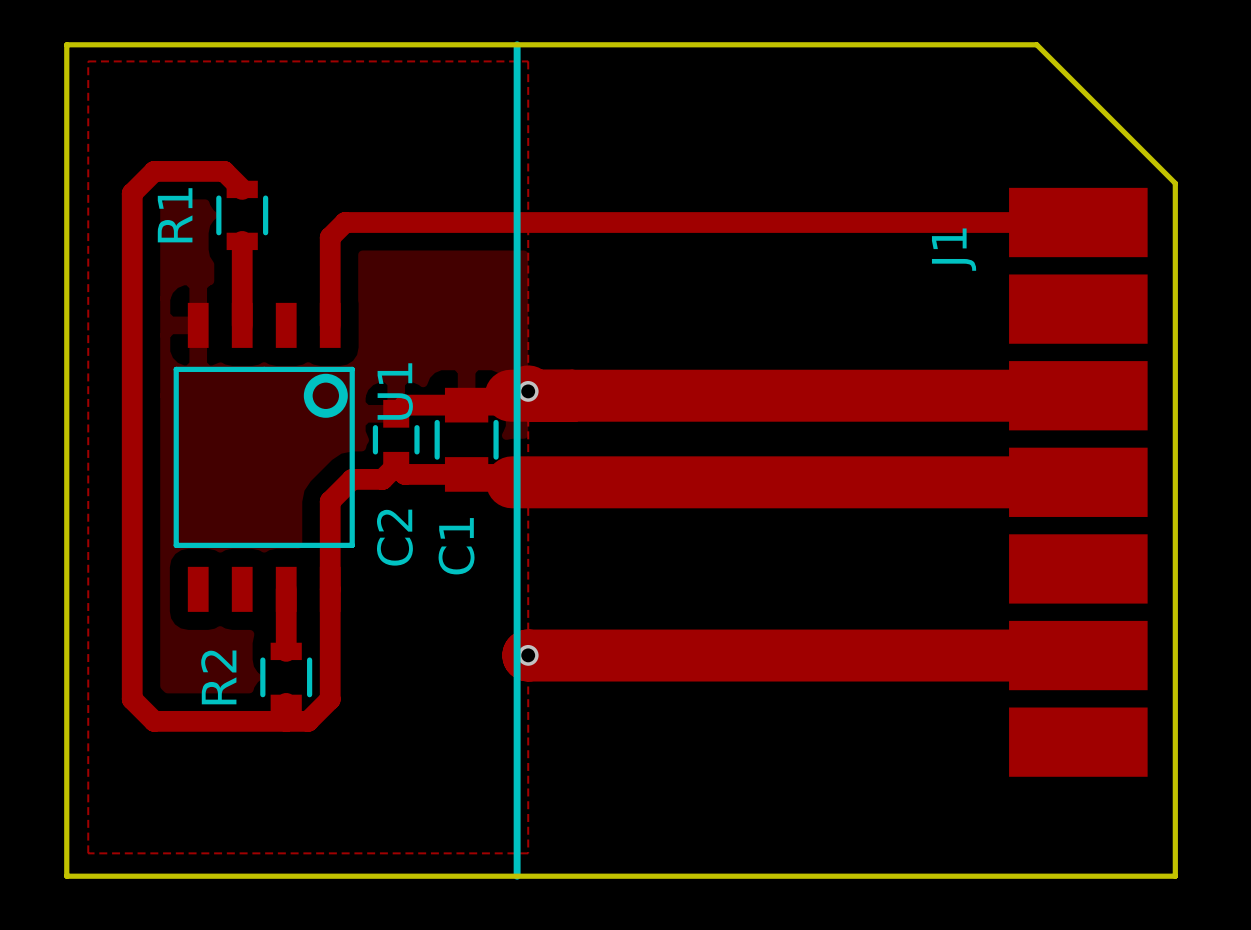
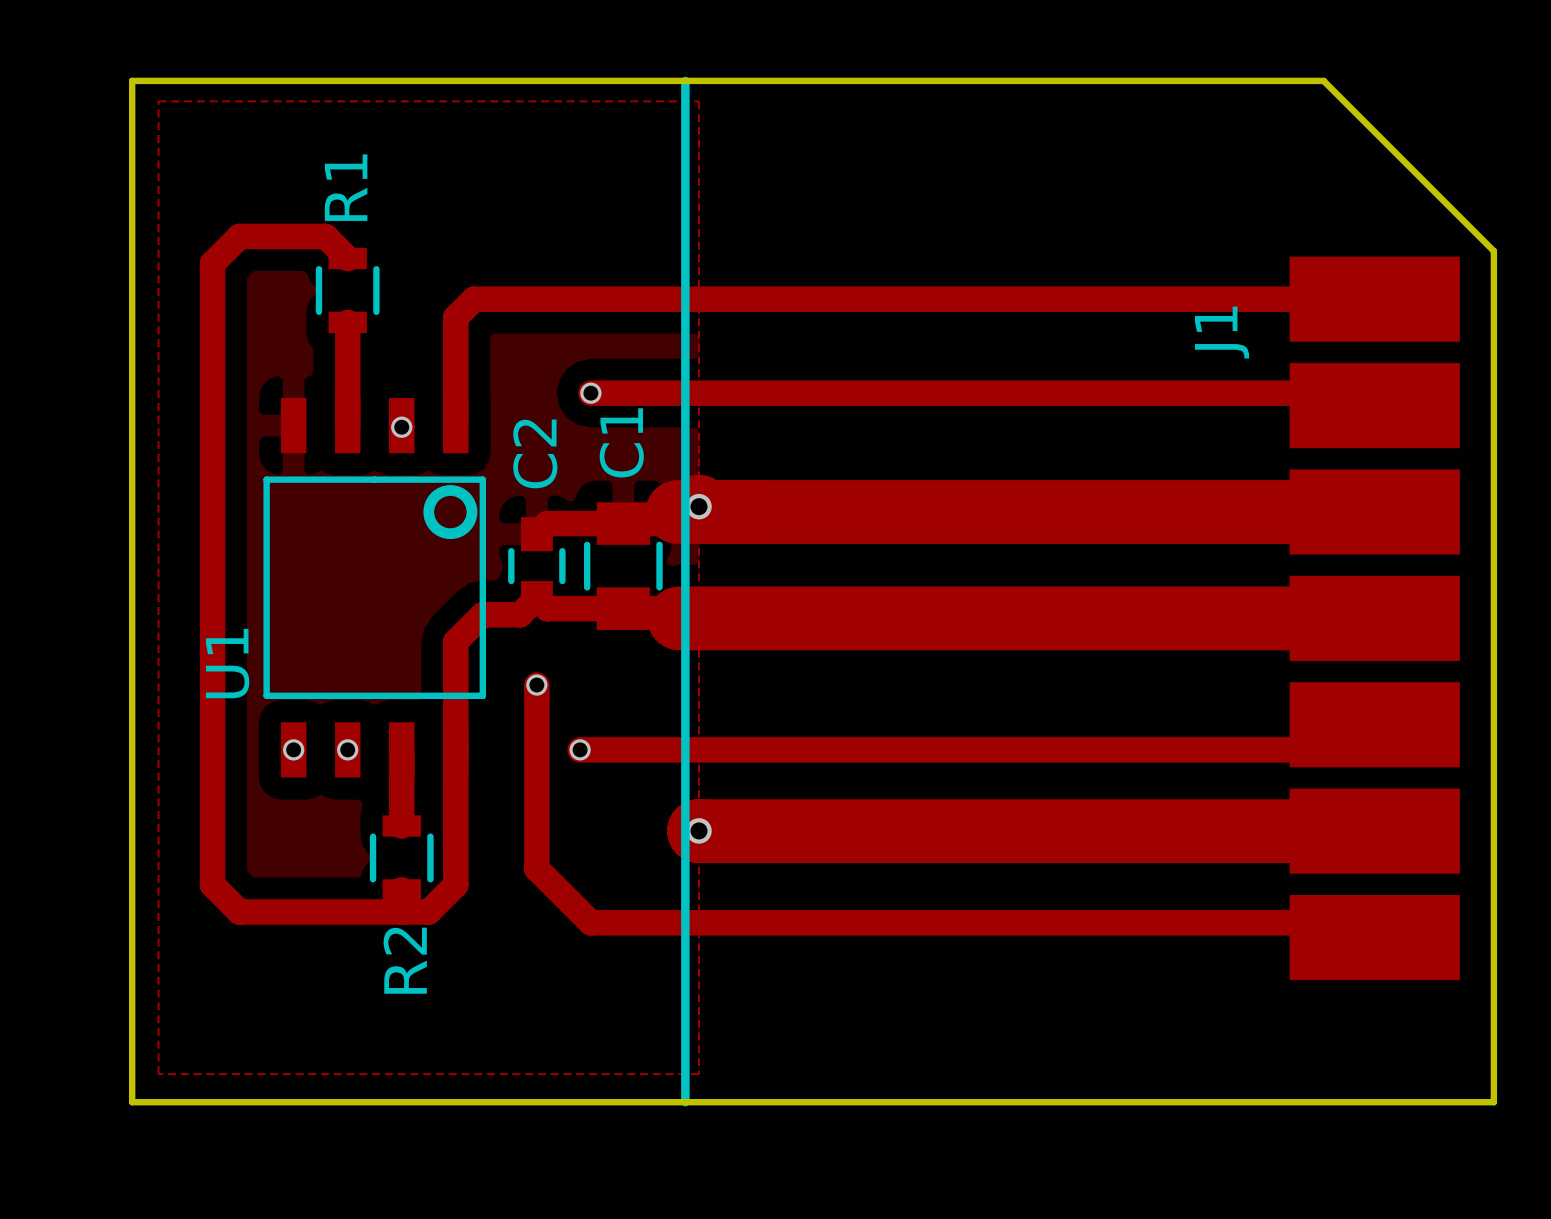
R1 name position: R1 (175, 215) -> R1 (346, 187)
track: none -> (590, 393) (1362, 393) (1374, 405)
via: none -> (590, 393)
via: none -> (401, 427)
U1 name position: U1 (395, 391) -> U1 (227, 663)
track: none -> (536, 685) (536, 868) (590, 922) (1360, 922) (1374, 937)
via: none -> (536, 685)
C2 name position: C2 (394, 537) -> C2 (535, 453)
C1 name position: C1 (456, 546) -> C1 (621, 442)
track: none -> (1374, 724) (1349, 749) (580, 749)
via: none -> (293, 749)
via: none -> (347, 749)
via: none -> (580, 749)
R2 name position: R2 (218, 677) -> R2 (405, 960)

